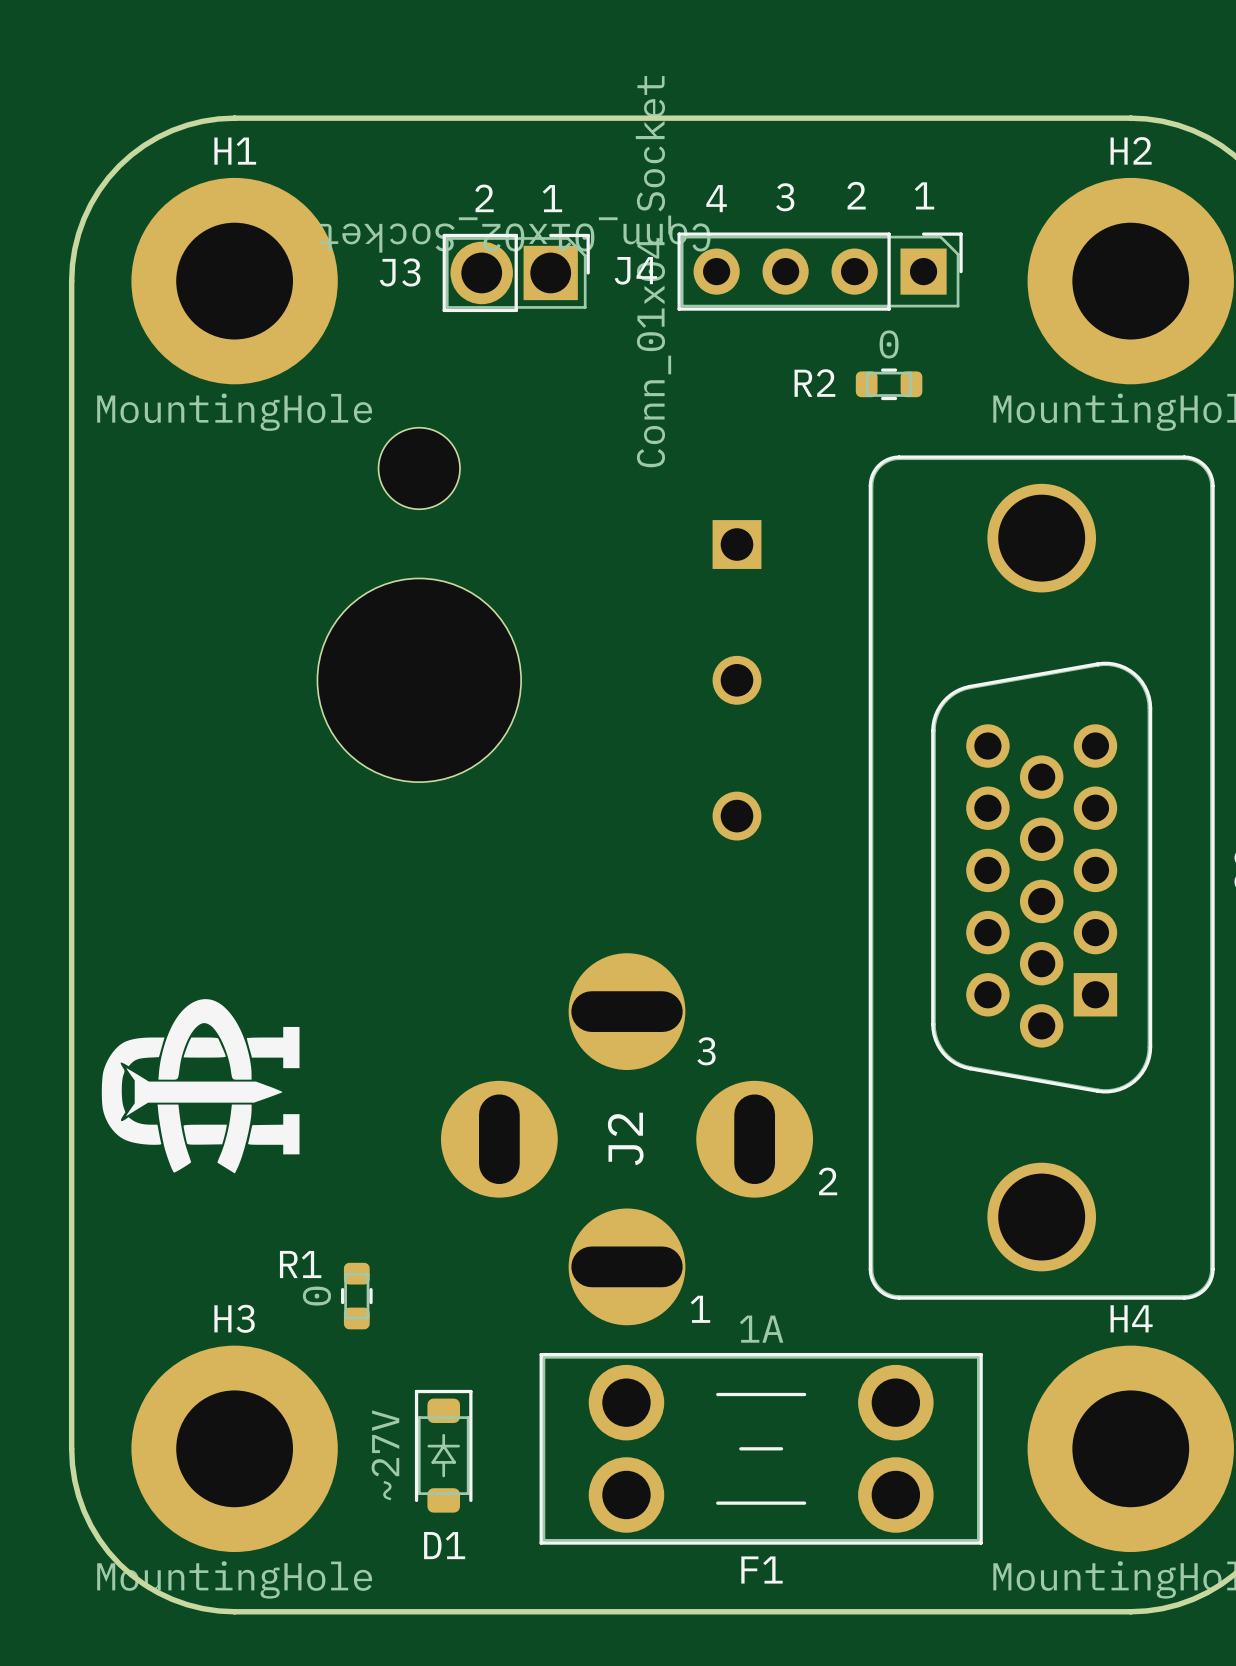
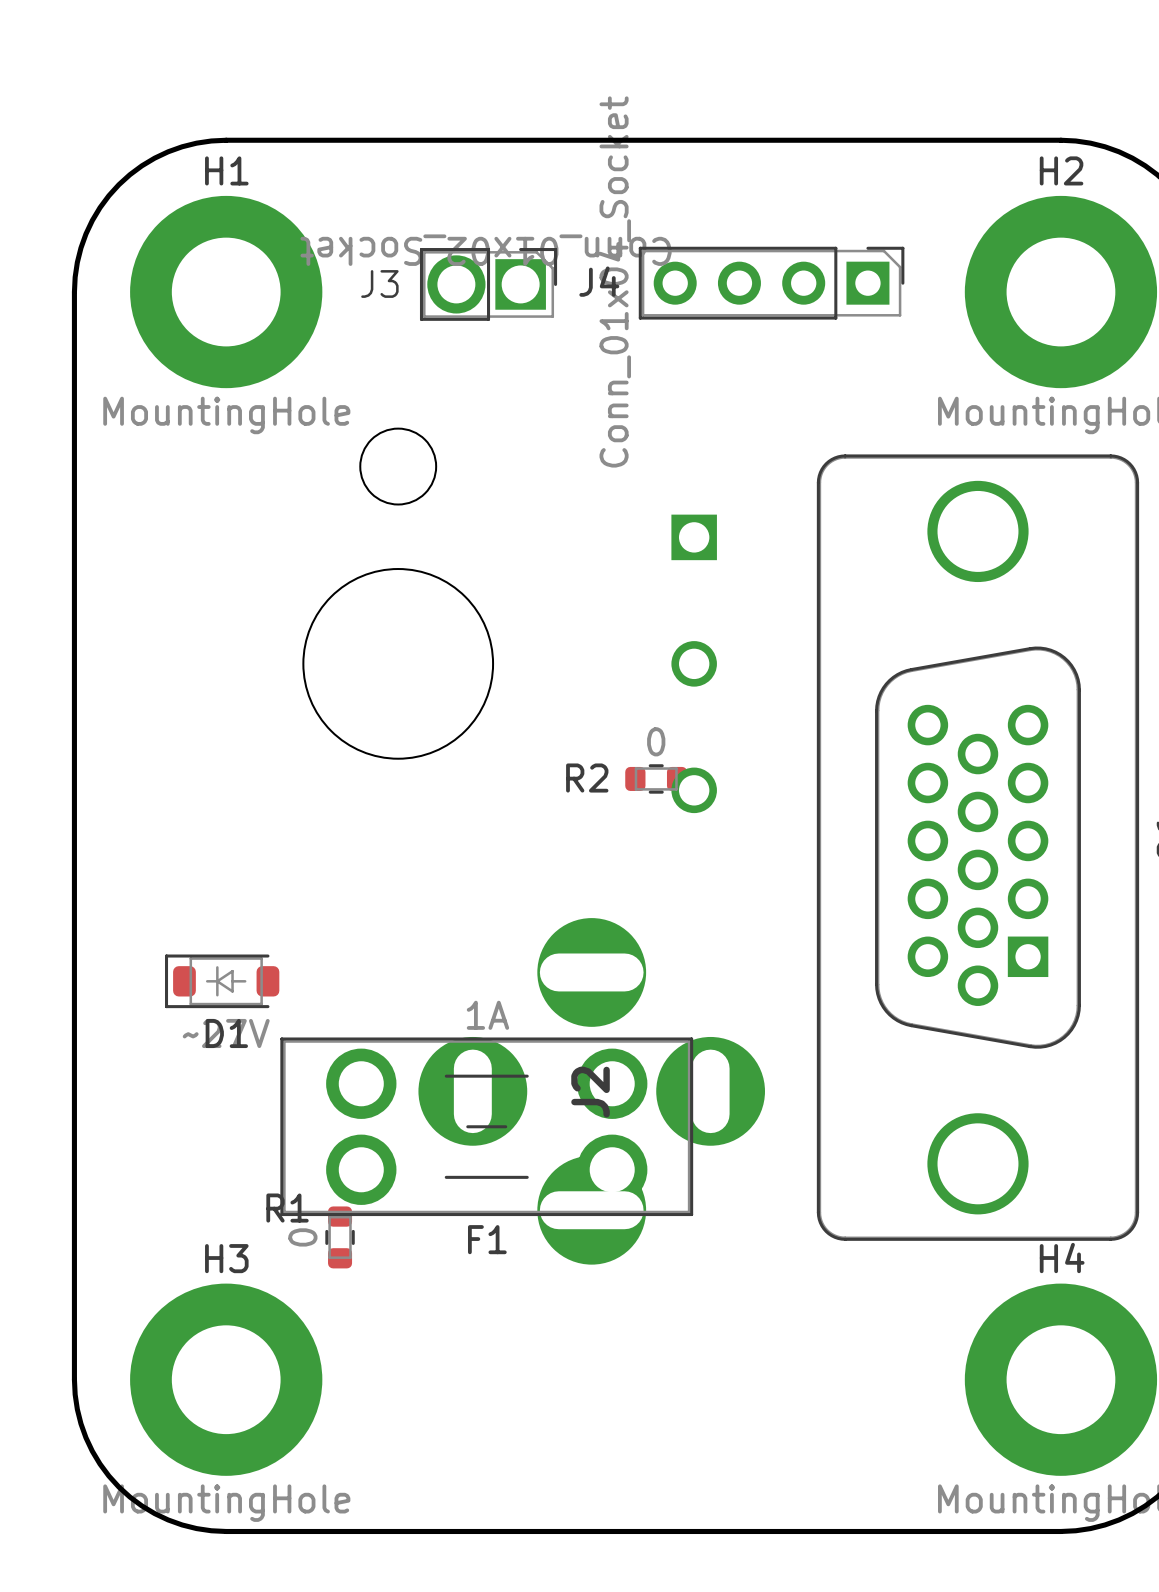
text: 2 (856, 195) -> none
text: 1 (924, 195) -> none
text: 3 (785, 197) -> none
text: 2 (484, 198) -> none
text: 1 (552, 198) -> none
text: 4 (716, 198) -> none
R2 position: (889, 384) -> (656, 778)
drawing: [101, 999, 300, 1174] -> none
text: 3 (706, 1051) -> none
text: 2 (828, 1181) -> none
text: 1 (700, 1309) -> none
F1 position: (761, 1448) -> (486, 1126)
D1 rotation: 0° (443, 1451) -> 90° counterclockwise (222, 981)
D1 position: (443, 1451) -> (222, 981)

